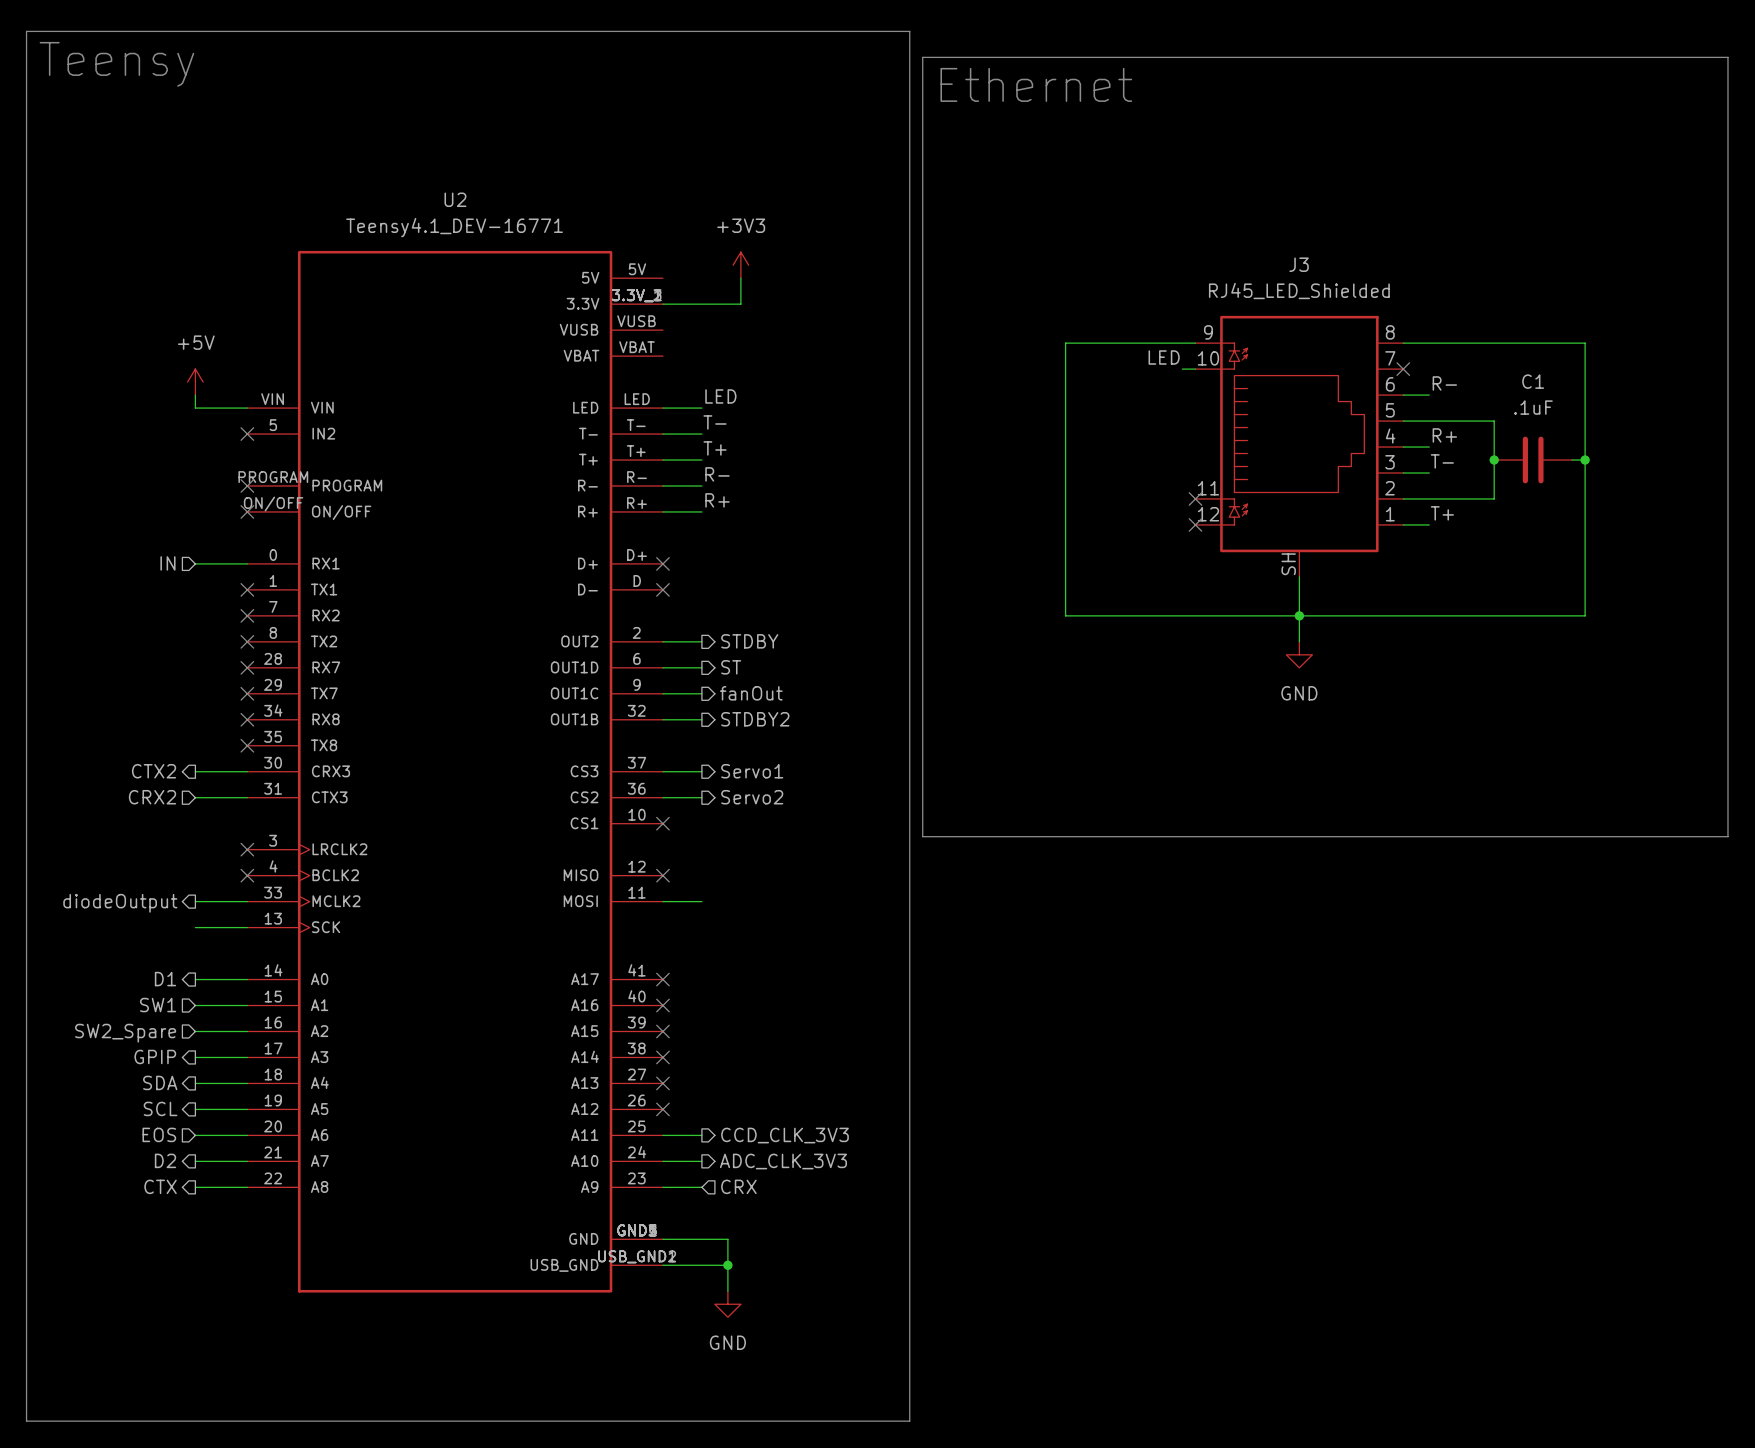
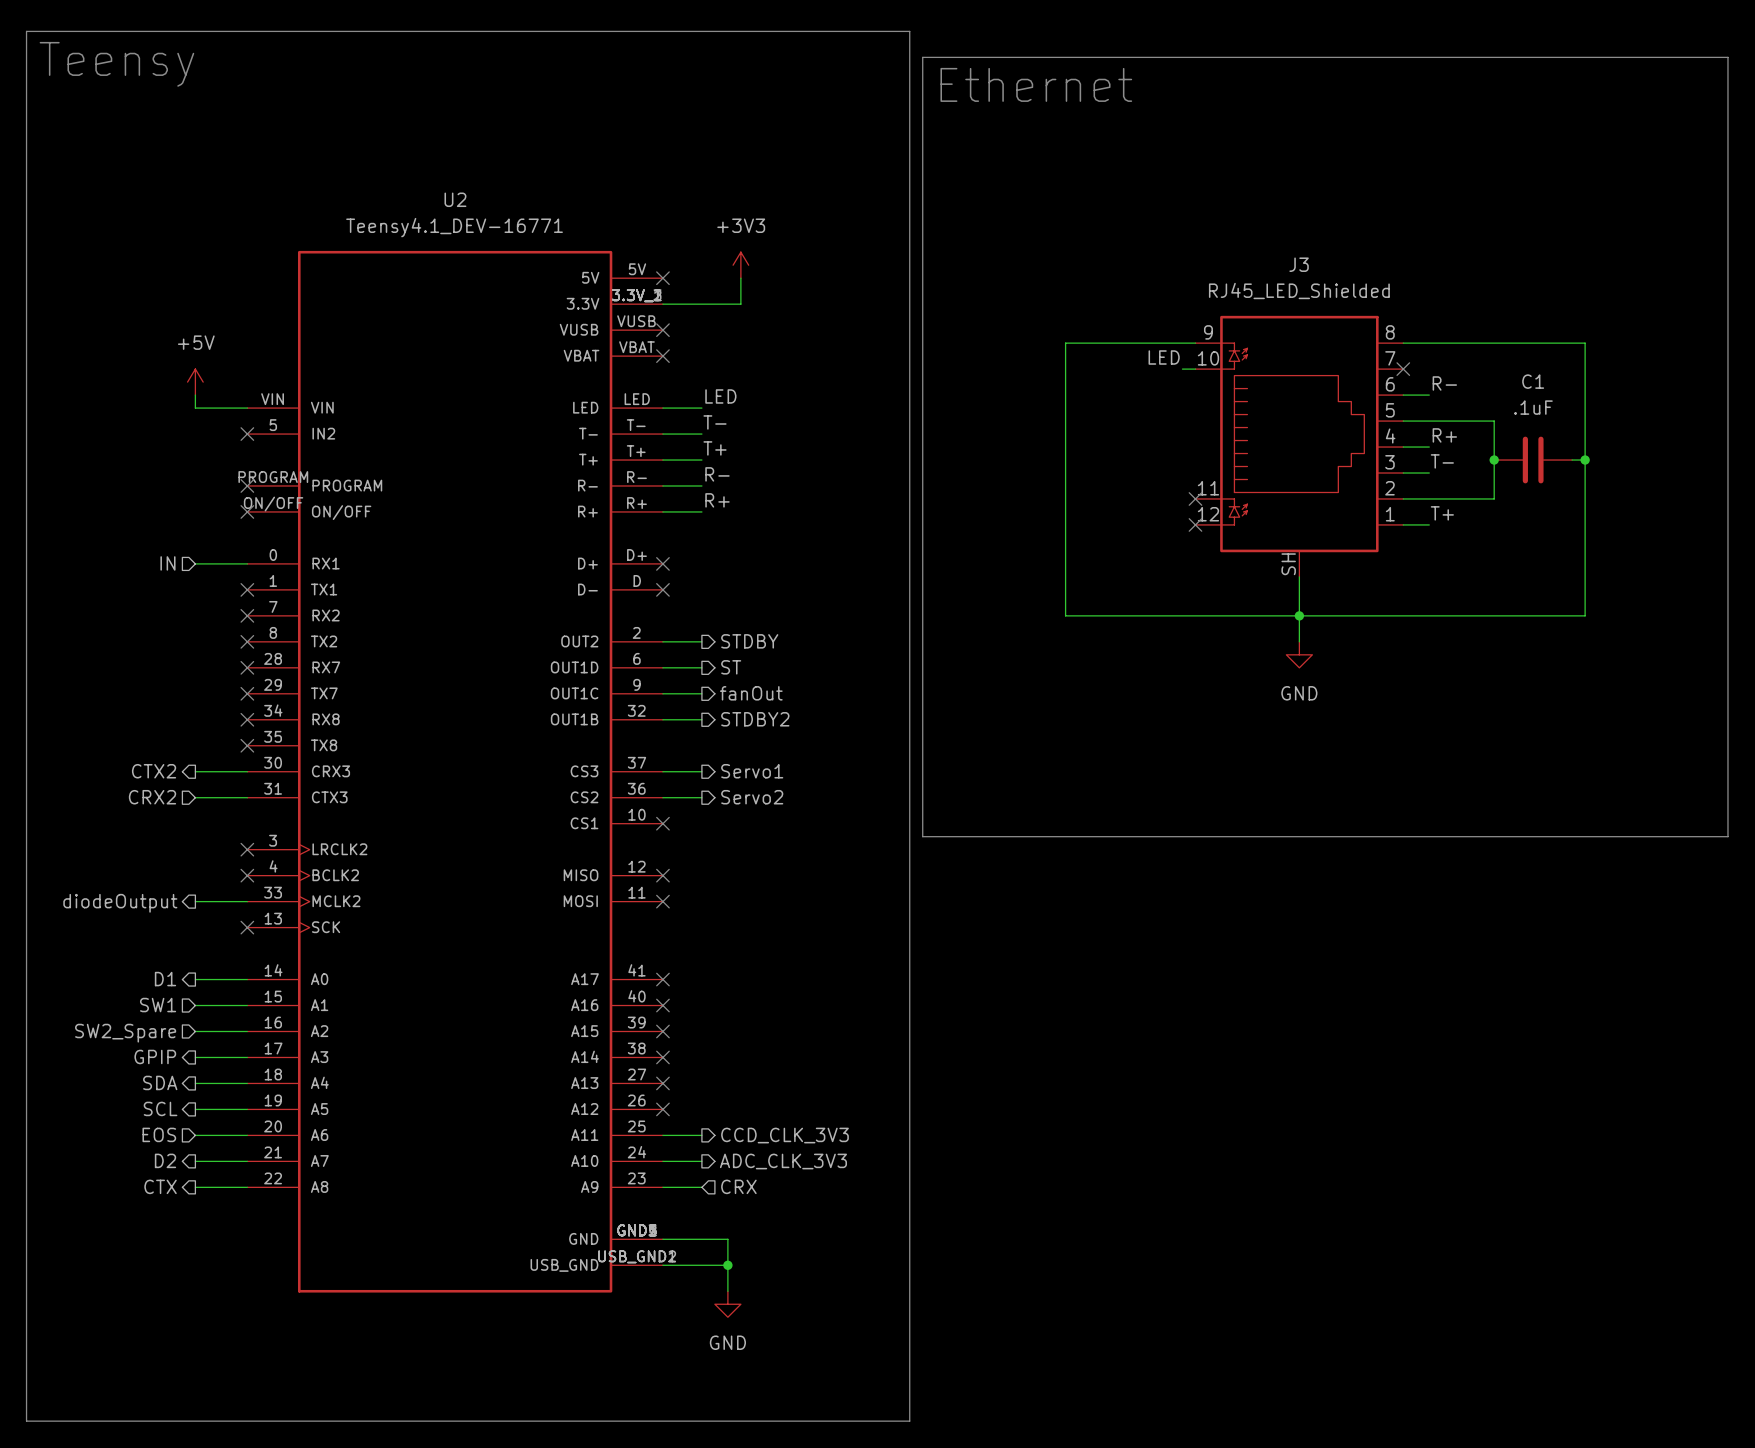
no-connect mark: none -> (662, 278)
no-connect mark: none -> (662, 330)
no-connect mark: none -> (662, 356)
wire: (662, 901) (701, 901) -> none
no-connect mark: none -> (662, 901)
wire: (195, 927) (247, 927) -> none
no-connect mark: none -> (247, 927)

